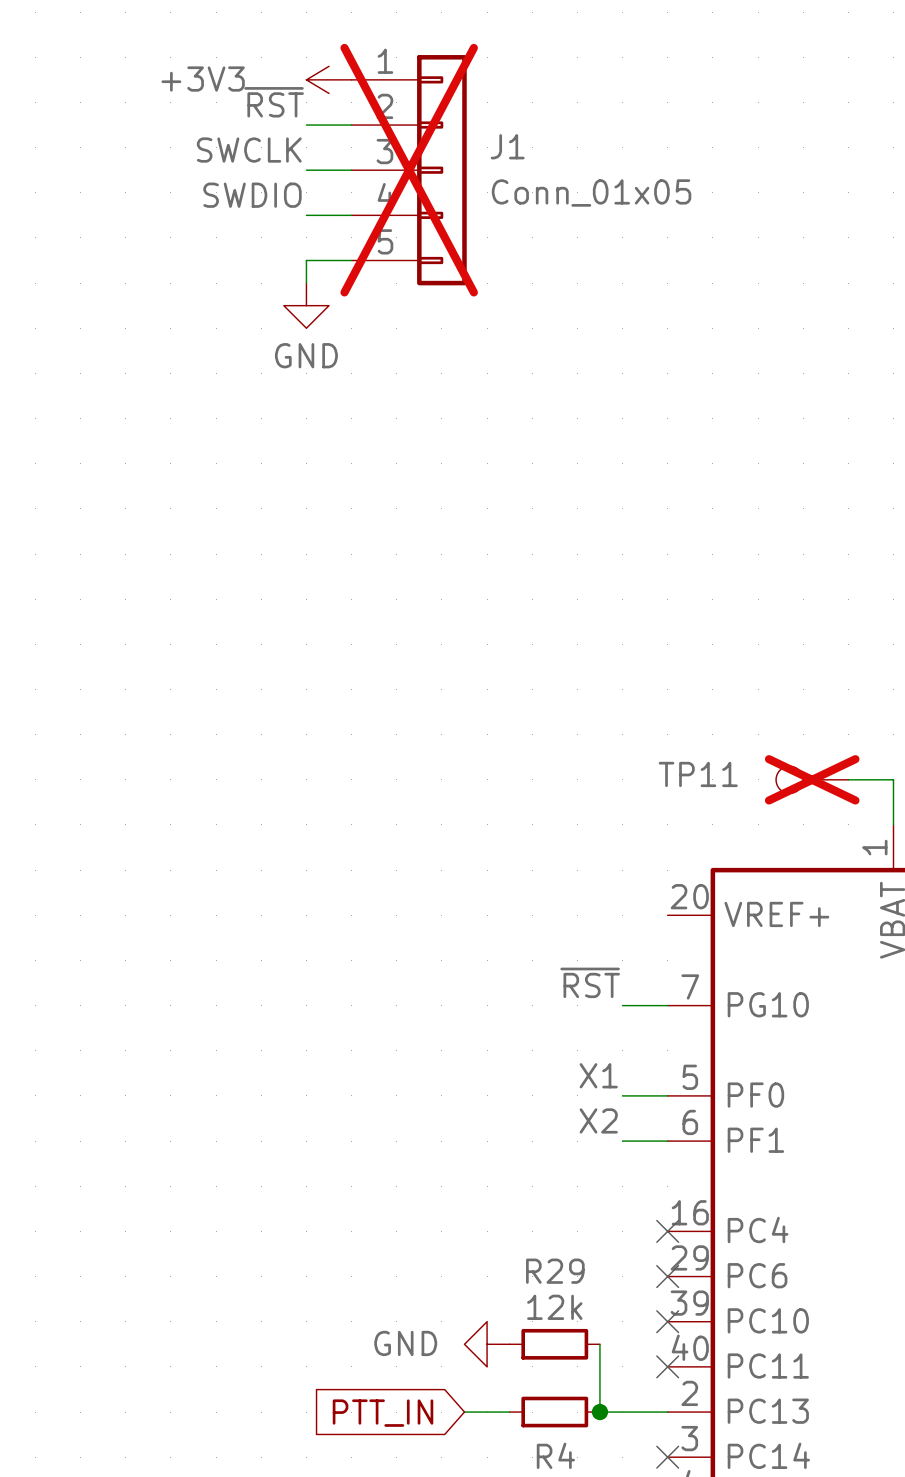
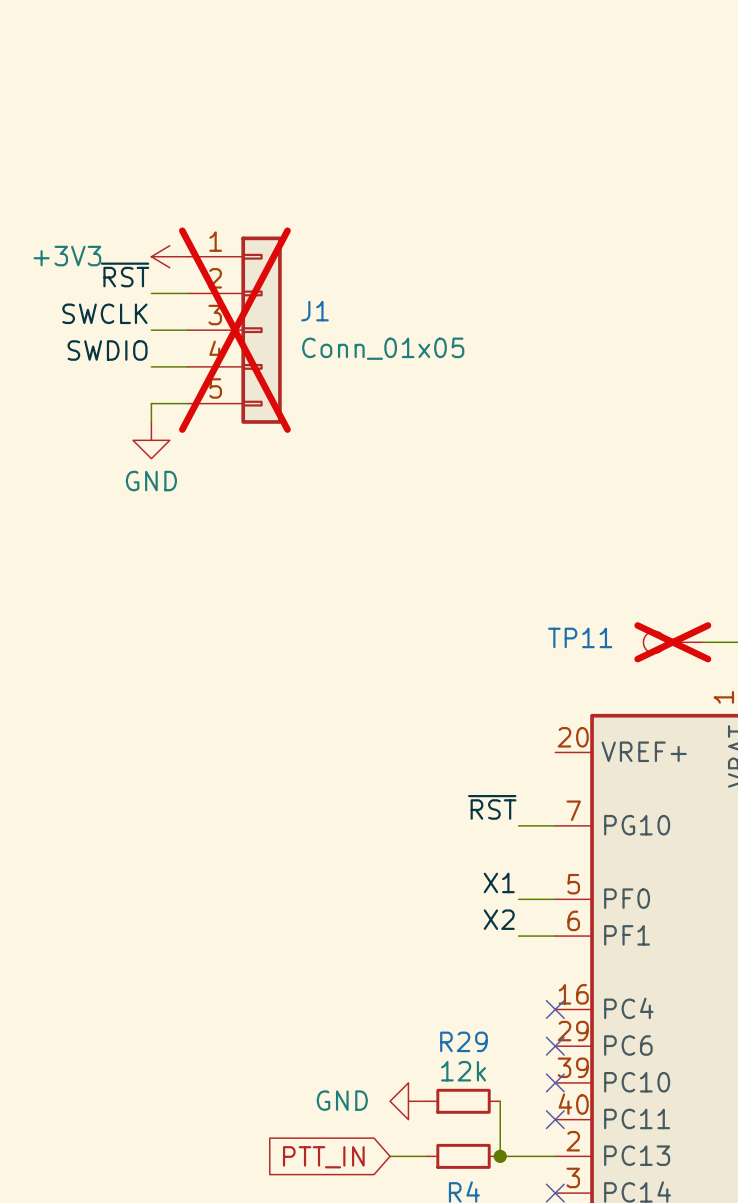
power symbol position: +3V3 (329, 79) -> +3V3 (169, 256)
label position: ~{RST} (274, 102) -> ~{RST} (125, 274)
wire: (306, 125) (351, 125) -> (151, 366) (188, 366)
label position: SWCLK (249, 150) -> SWCLK (104, 313)
wire: (306, 170) (351, 170) -> (151, 330) (188, 330)
J1 position: (409, 170) -> (234, 330)
label position: SWDIO (252, 195) -> SWDIO (107, 350)
wire: (306, 215) (351, 215) -> (151, 293) (188, 293)
wire: (351, 260) (306, 260) (306, 283) -> (188, 403) (151, 403) (151, 421)
power symbol position: GND (306, 305) -> GND (151, 440)

